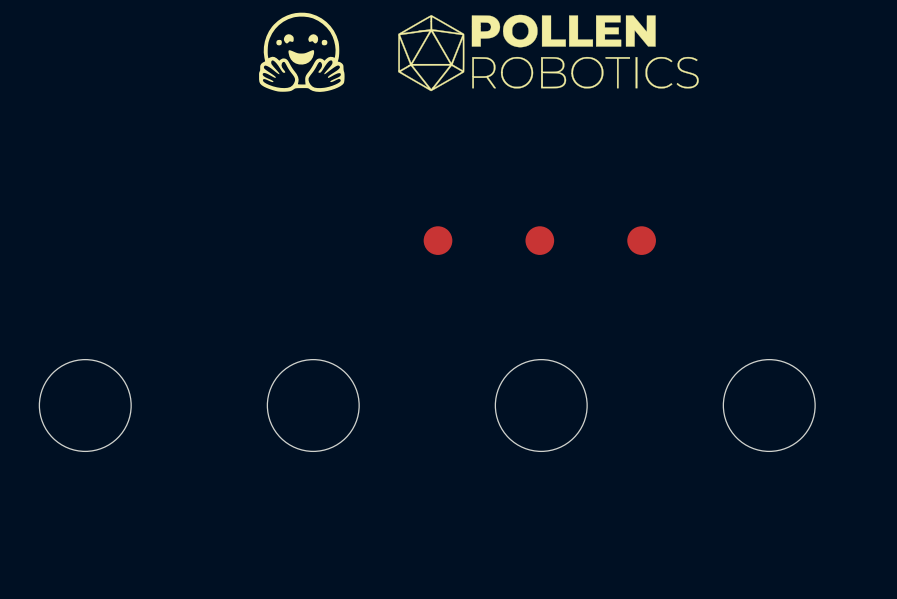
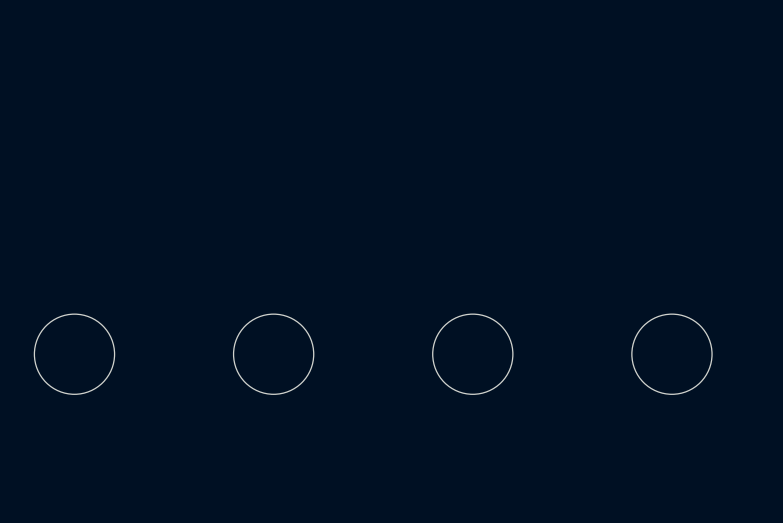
drawing: [259, 12, 345, 92] -> none
drawing: [398, 14, 699, 92] -> none
part: (438, 240) -> none
part: (539, 240) -> none
part: (641, 240) -> none

